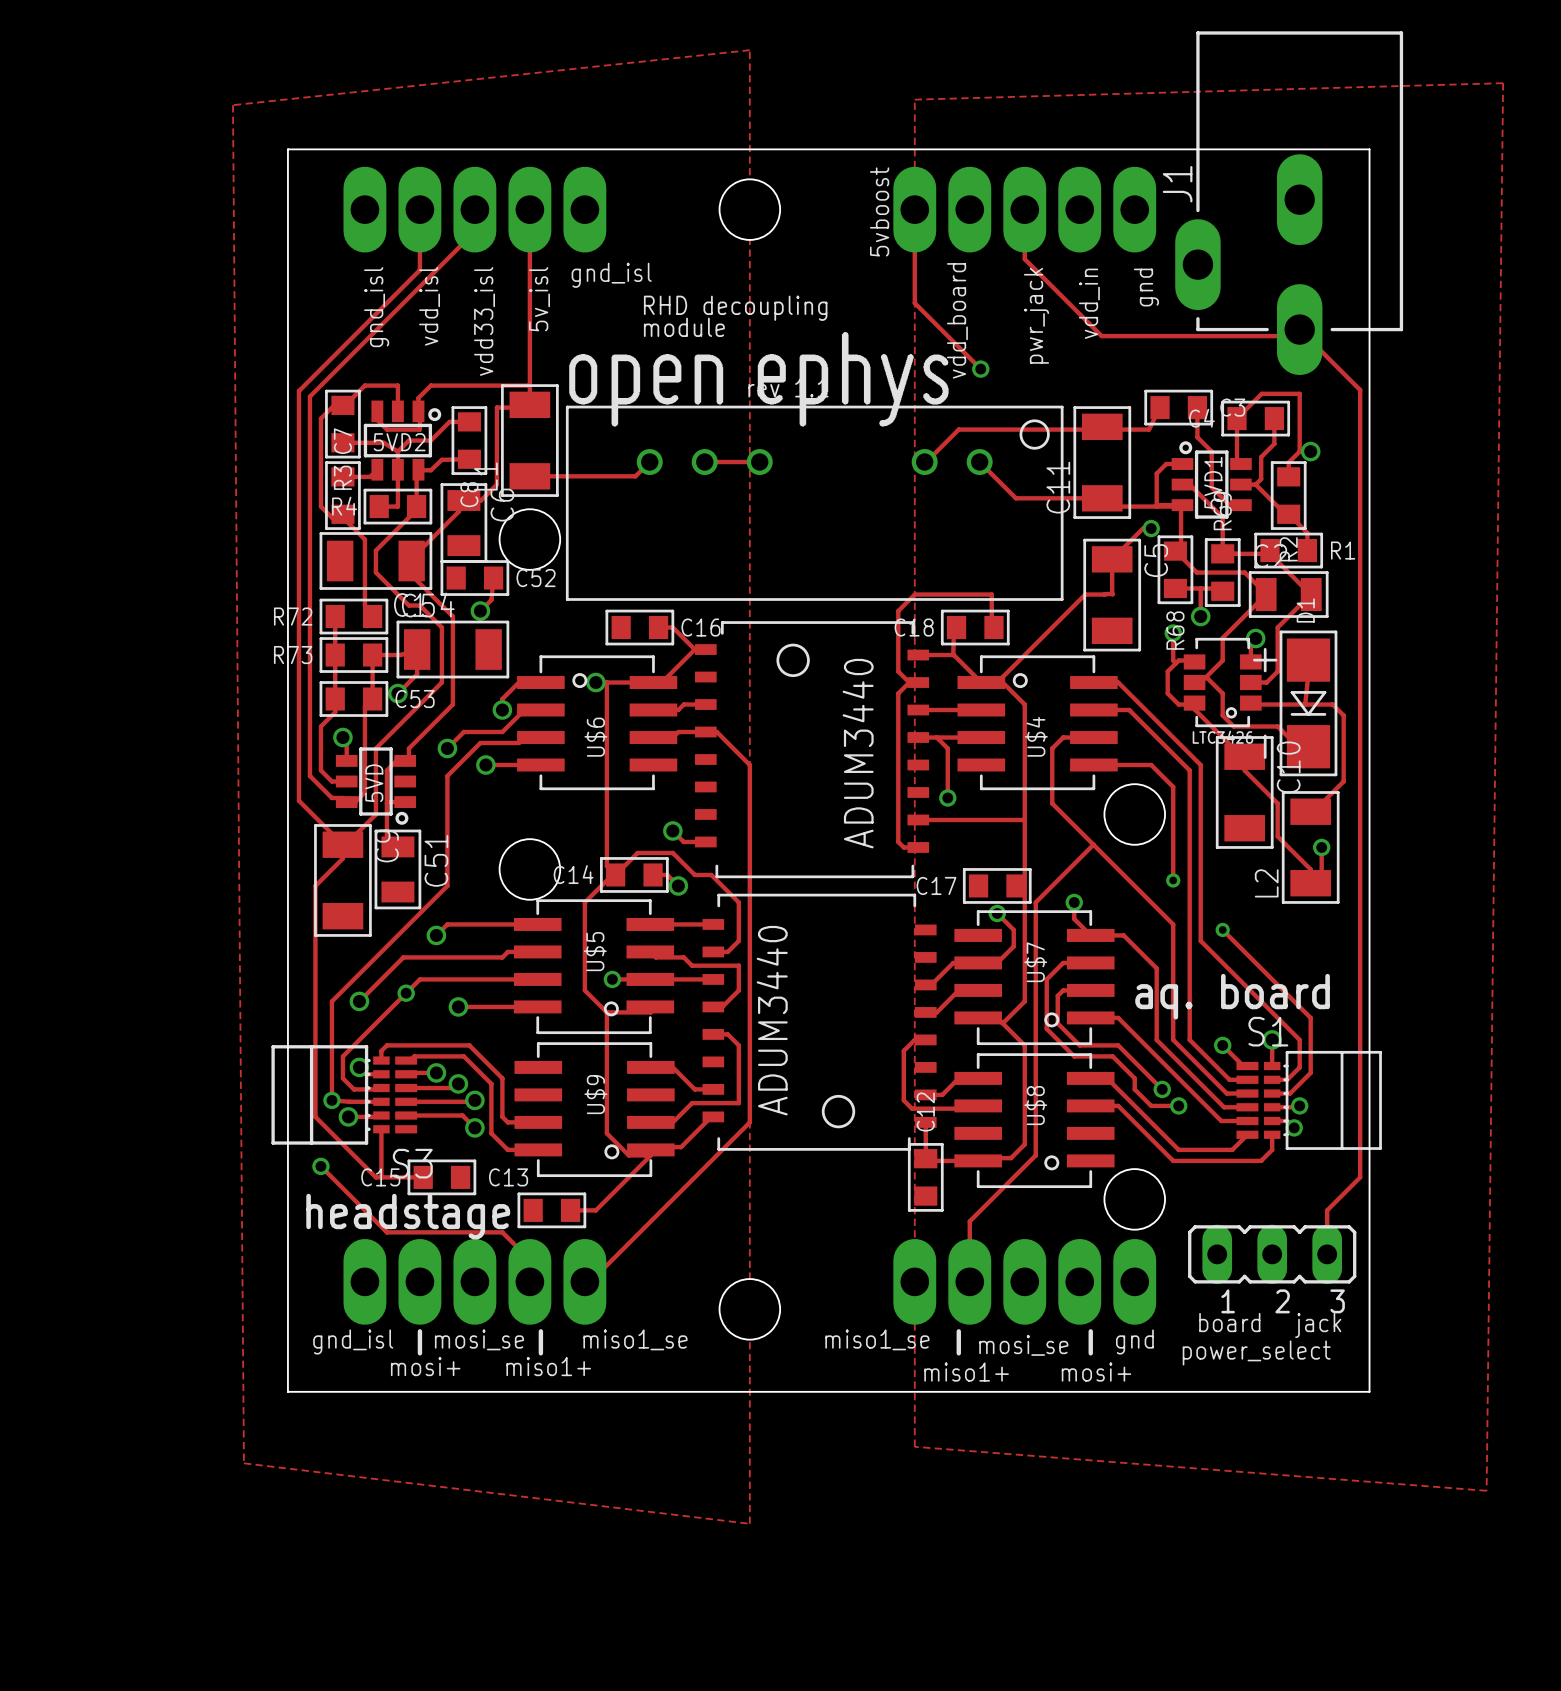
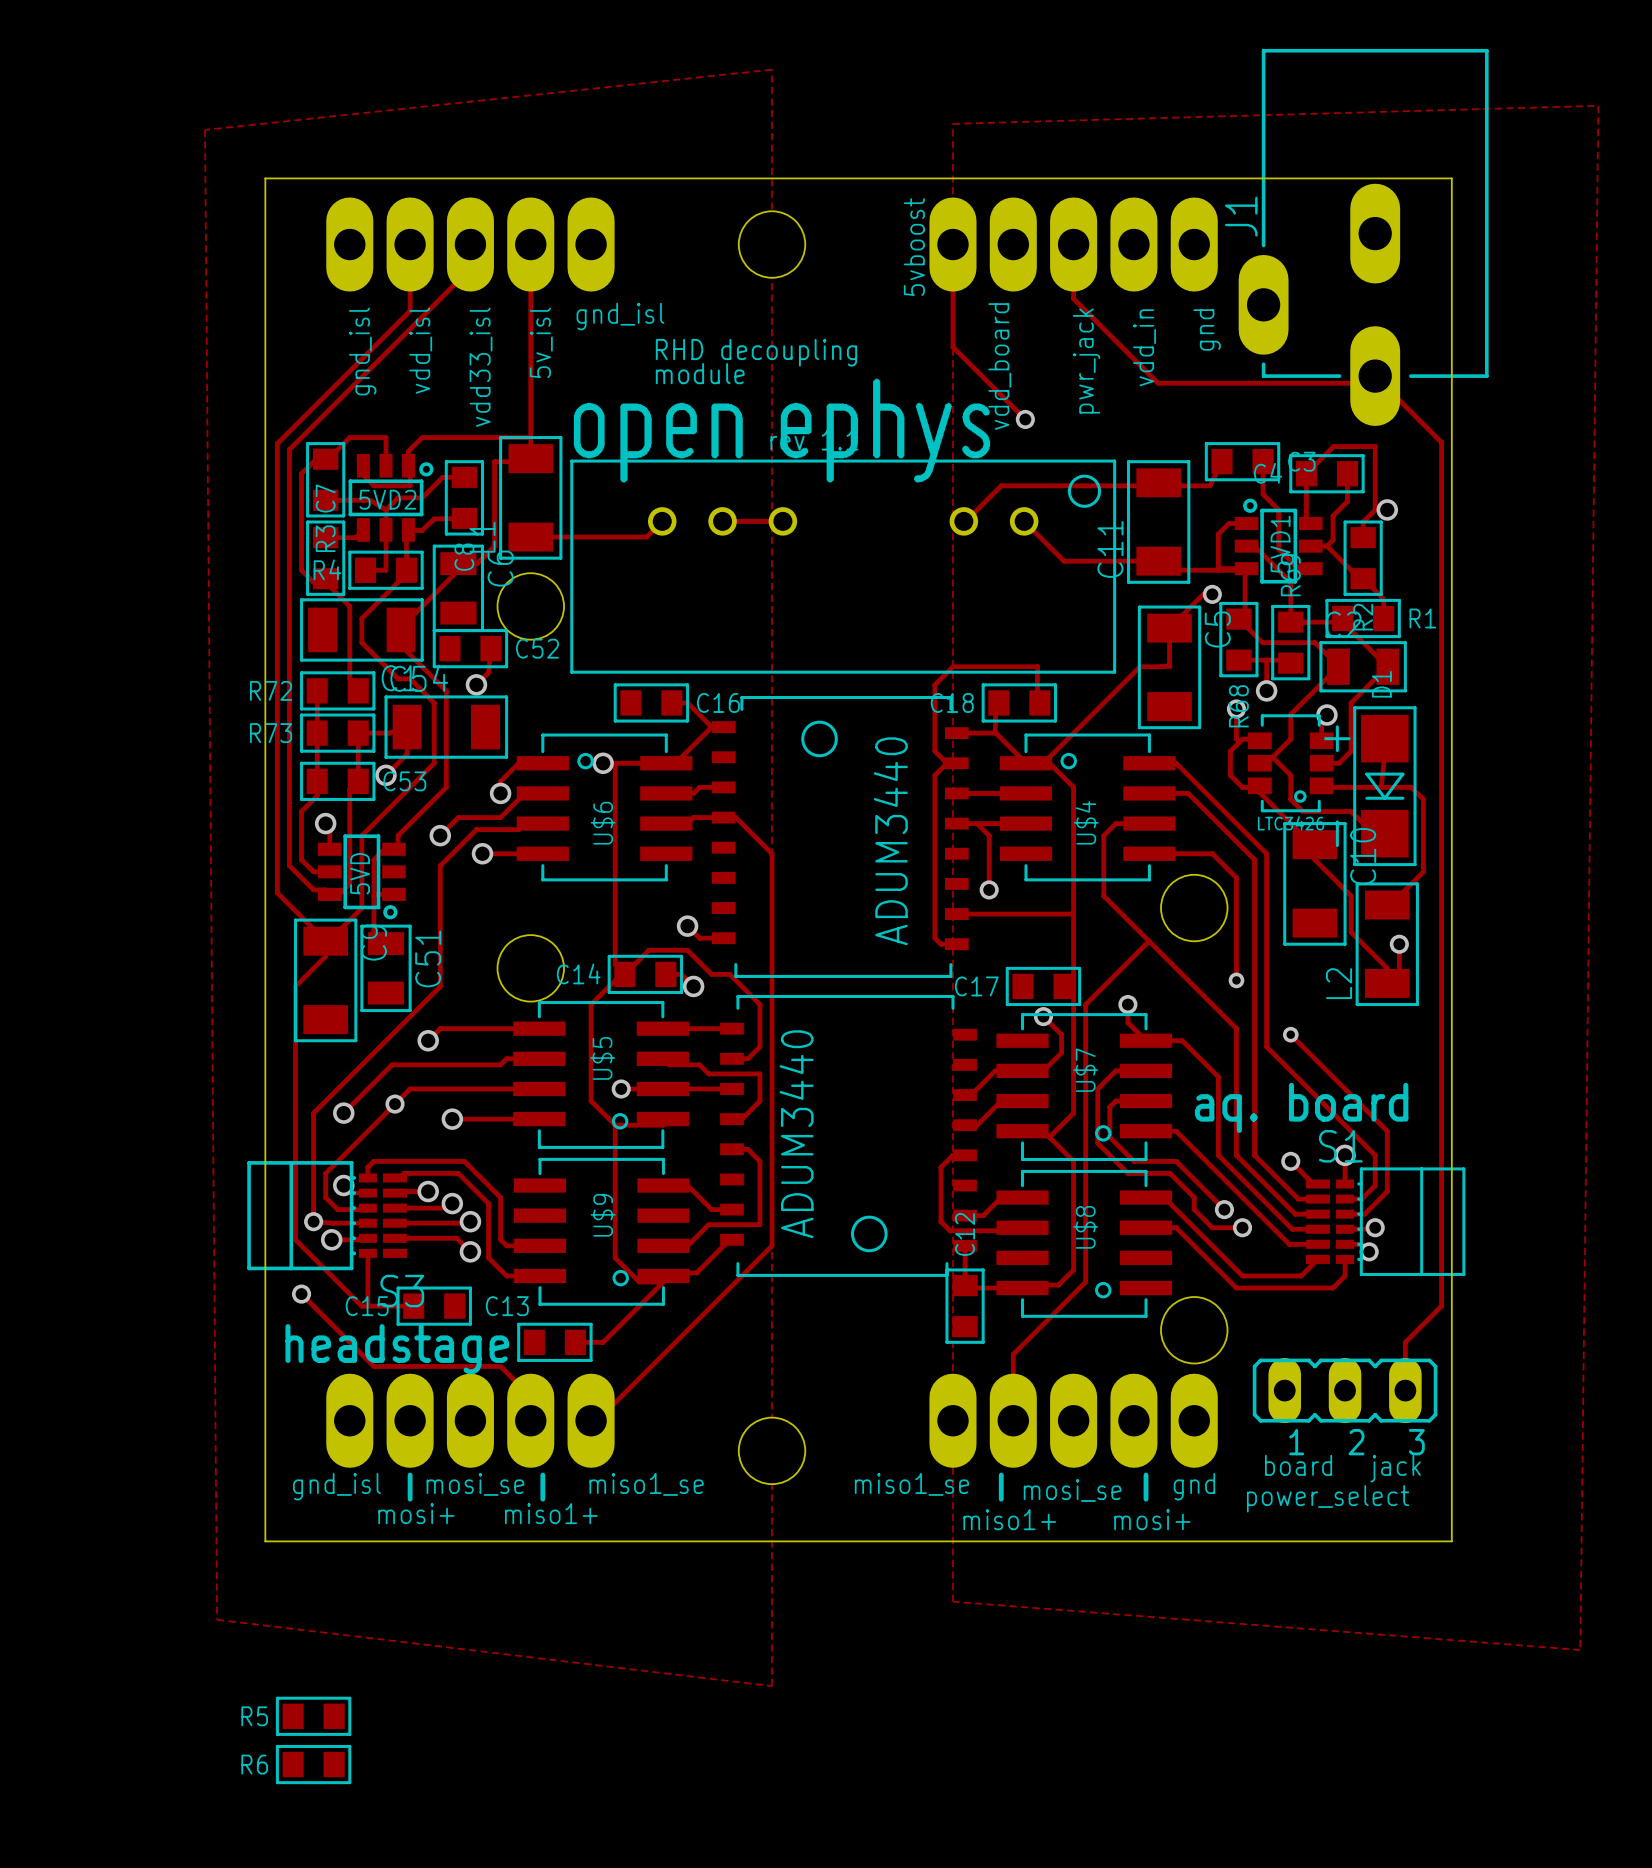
R5: none -> (313, 1716)
R6: none -> (313, 1764)

